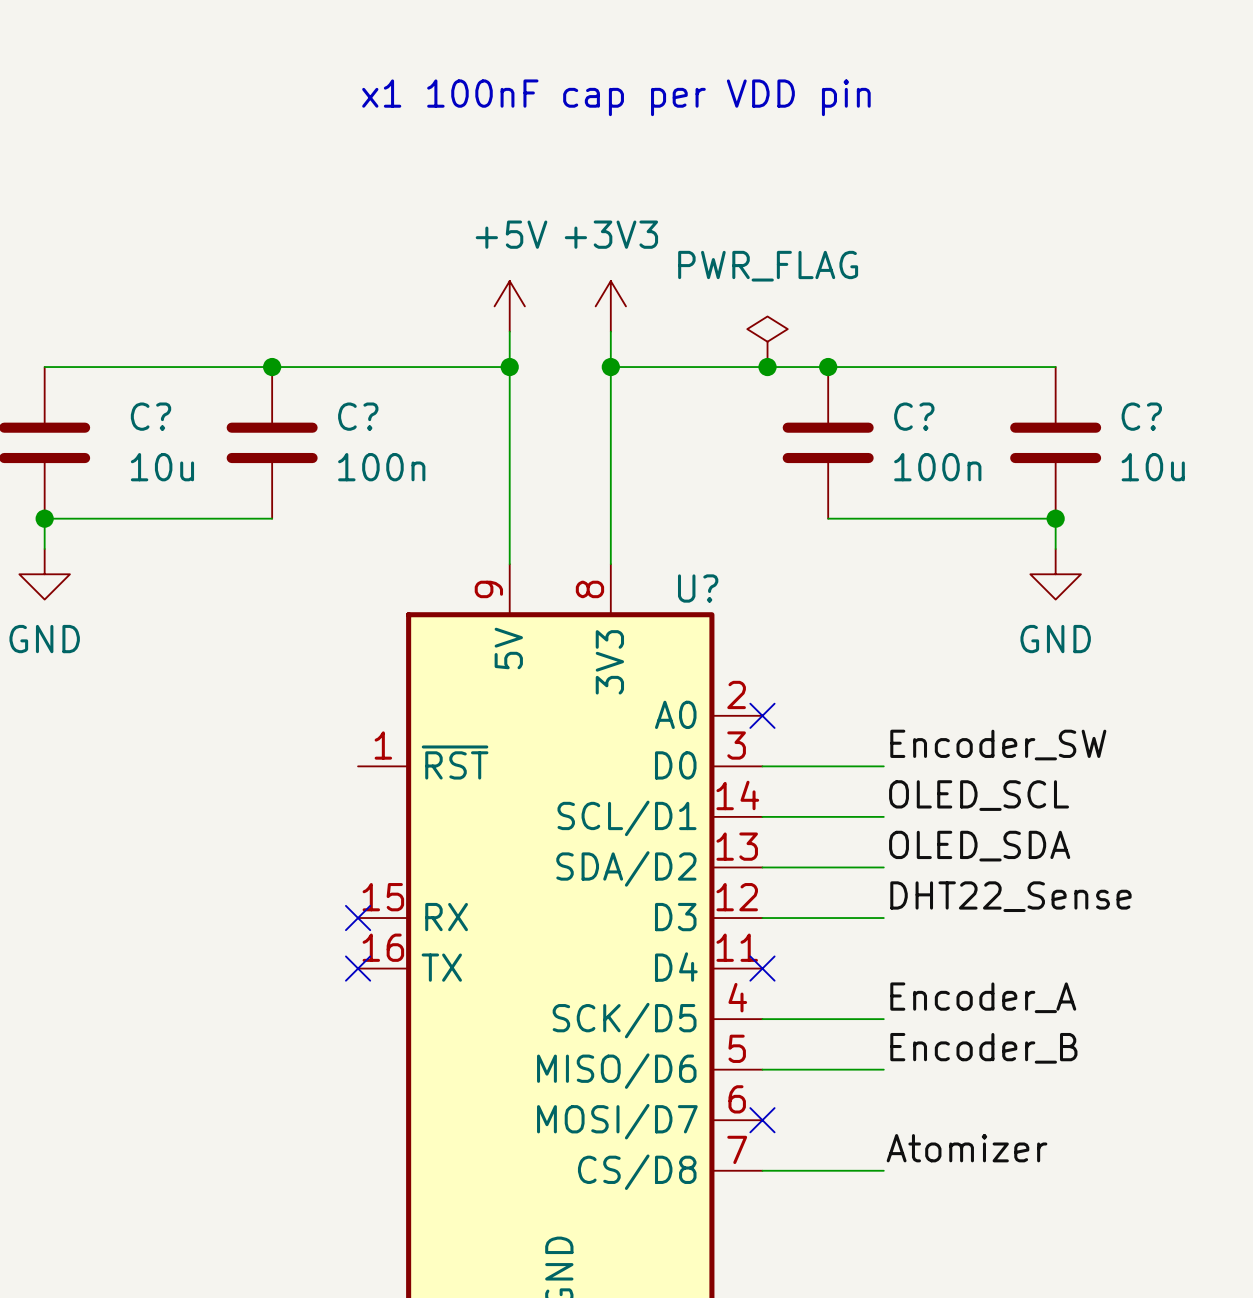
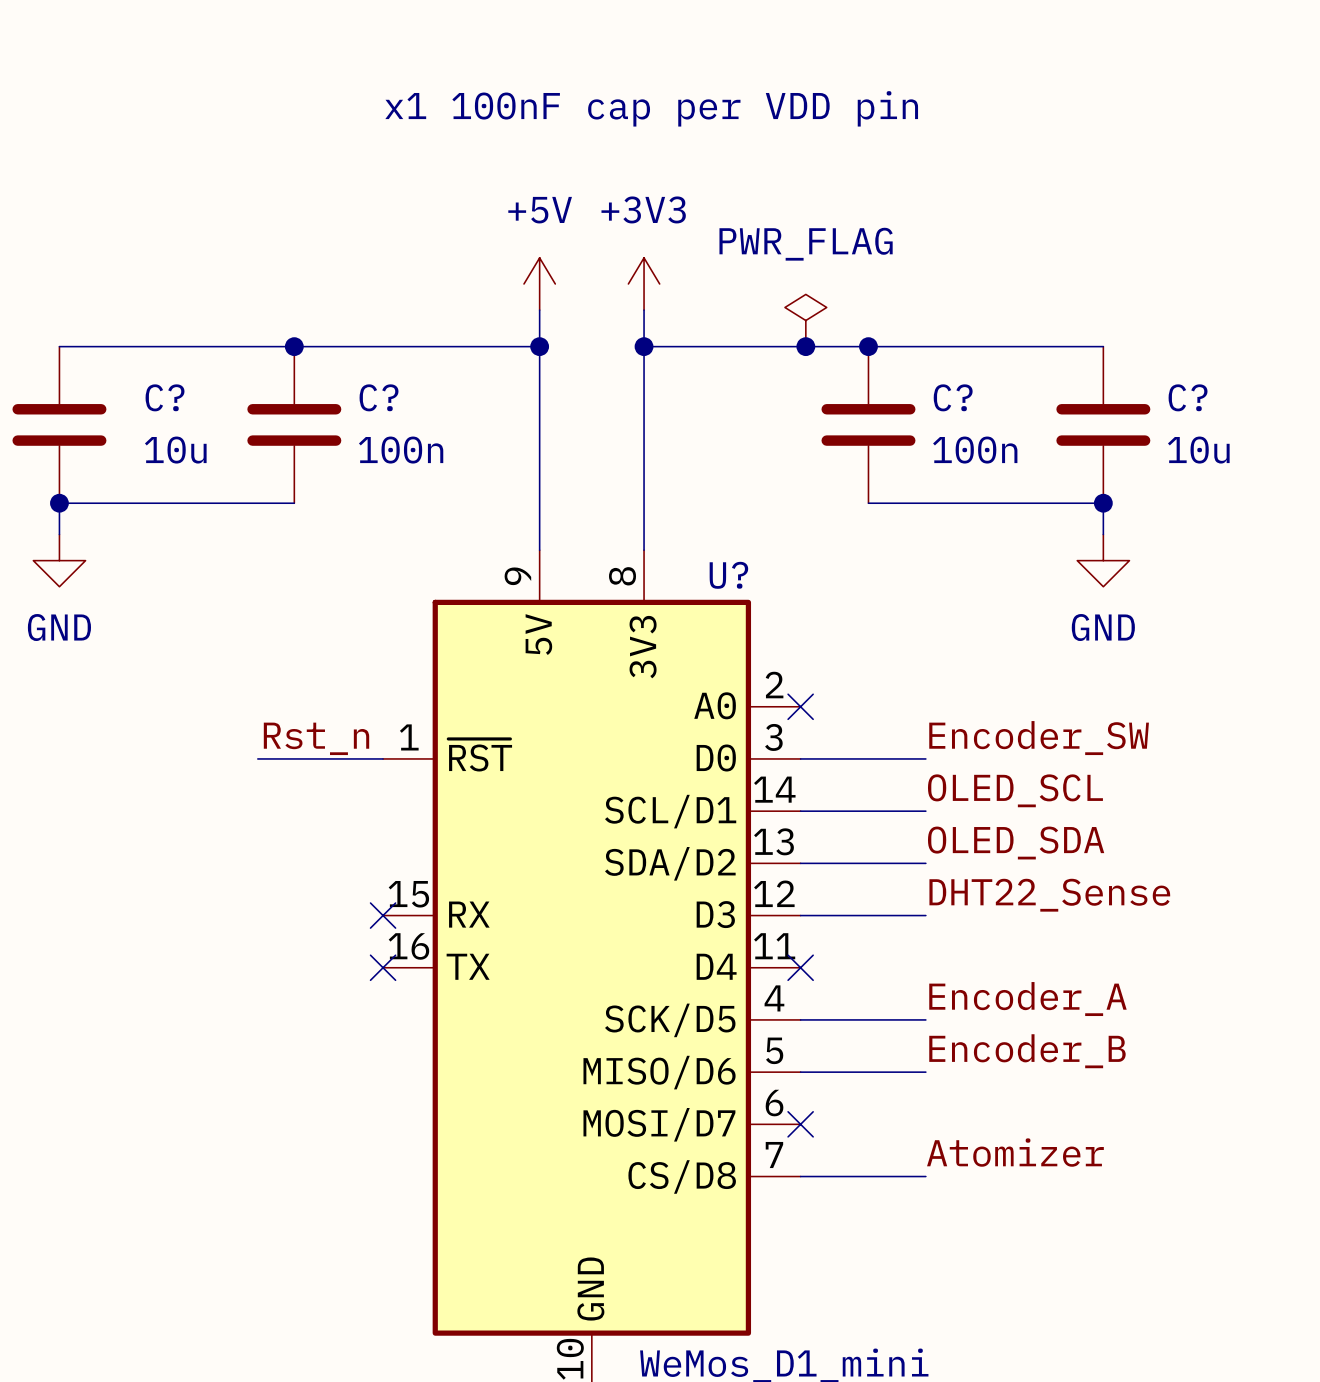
text position: x1 100nF cap per VDD pin (616, 97) -> x1 100nF cap per VDD pin (651, 108)
label: none -> Rst_n (316, 738)
wire: none -> (257, 758) (383, 758)

